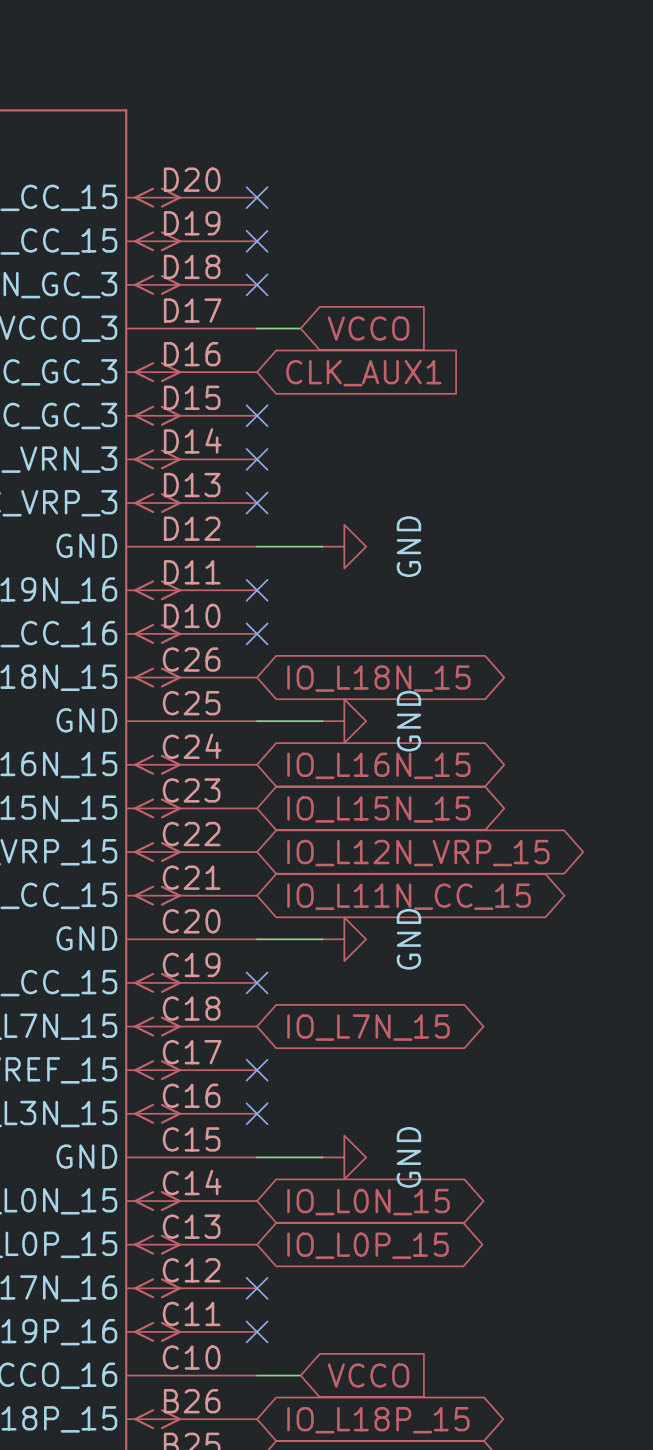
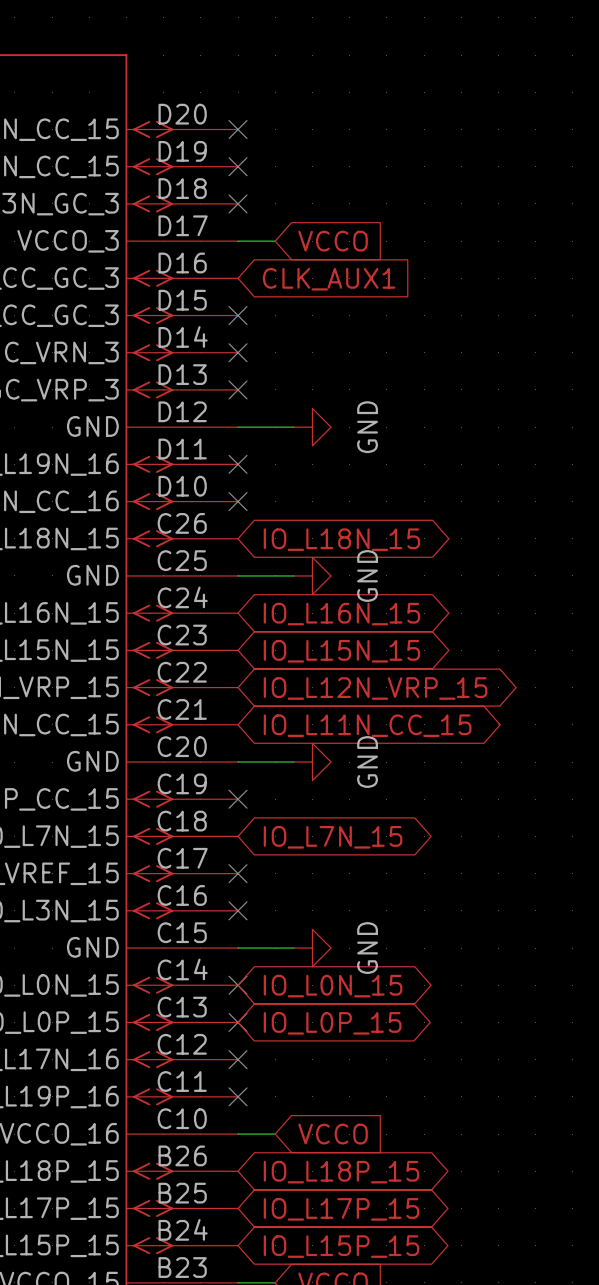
no-connect mark: none -> (238, 985)
no-connect mark: none -> (238, 1022)

